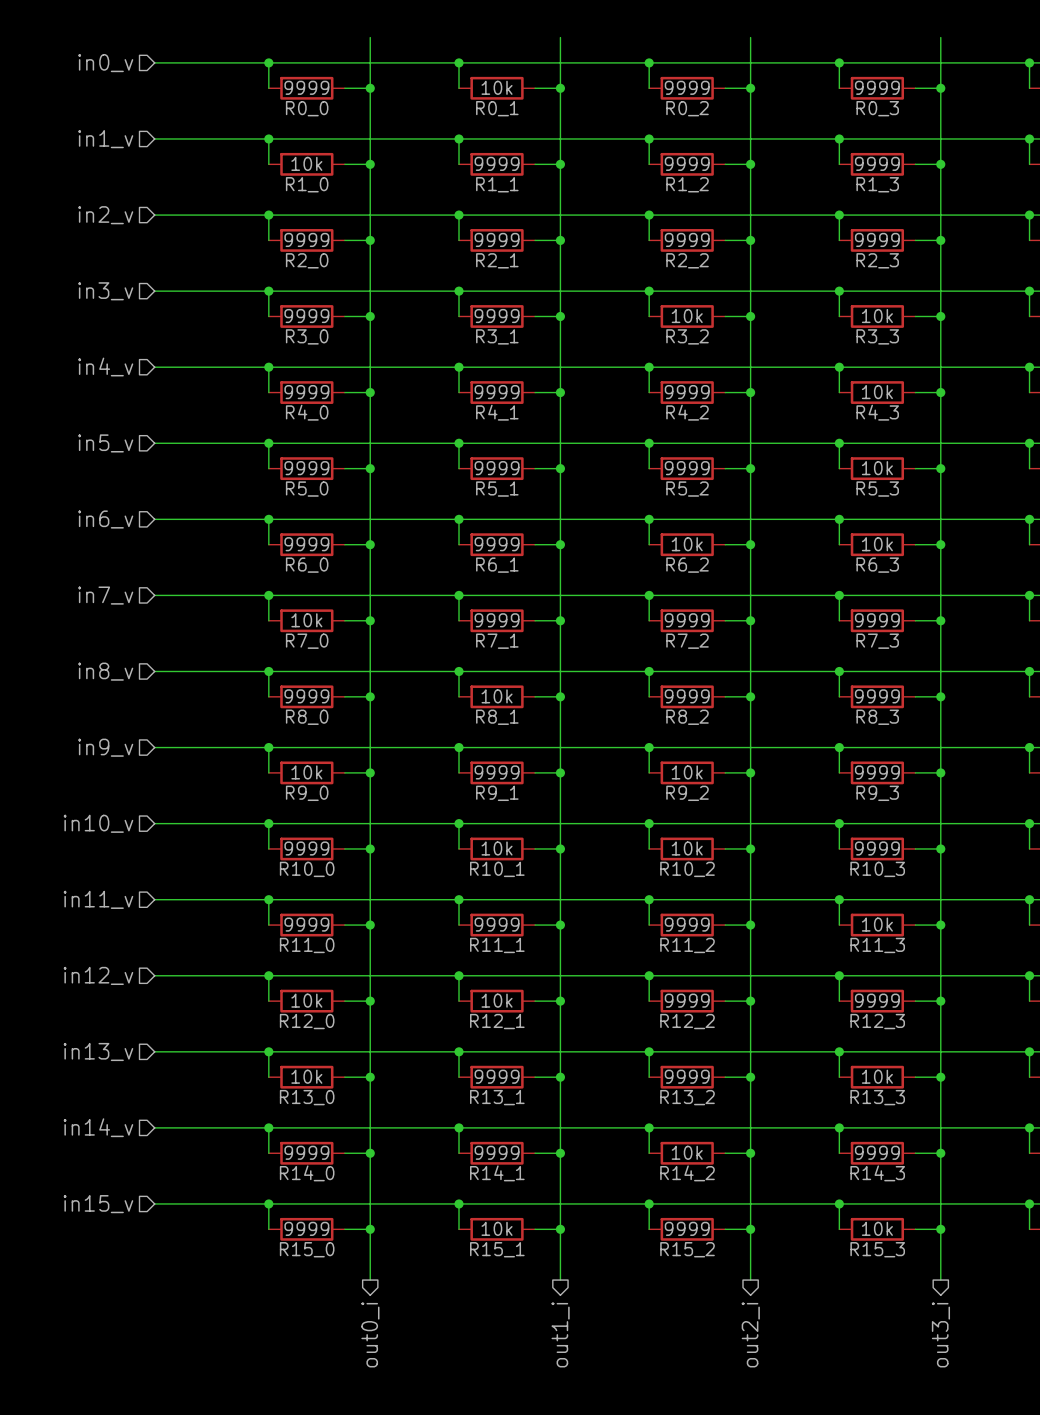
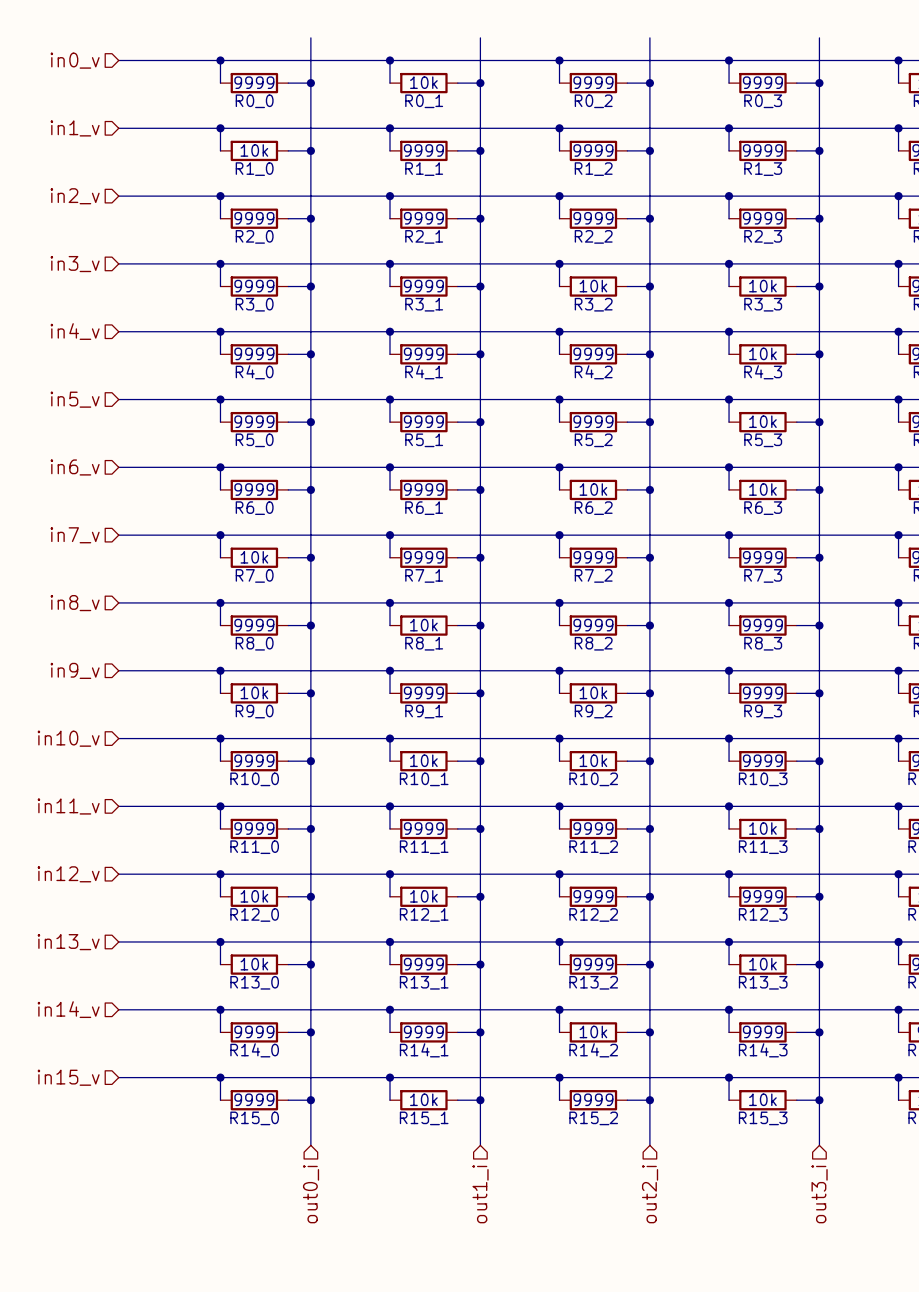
hierarchical label shape: output (370, 1334) -> input (311, 1194)
hierarchical label shape: output (560, 1334) -> input (480, 1194)
hierarchical label shape: output (750, 1334) -> input (650, 1194)
hierarchical label shape: output (940, 1334) -> input (819, 1194)

